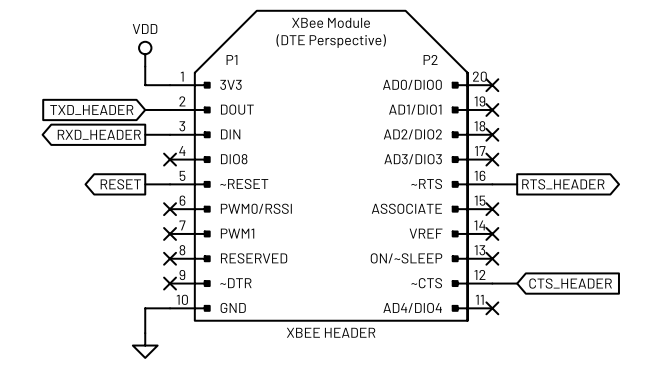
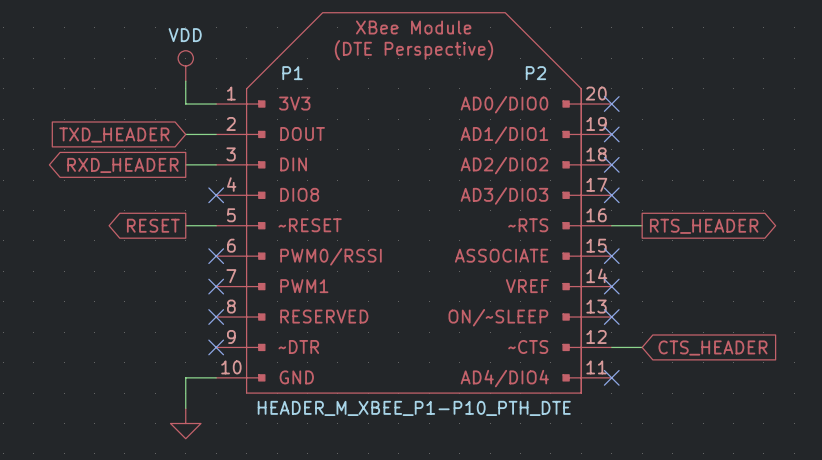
P1 value: XBEE HEADER (331, 332) -> HEADER_M_XBEE_P1-P10_PTH_DTE (414, 408)

